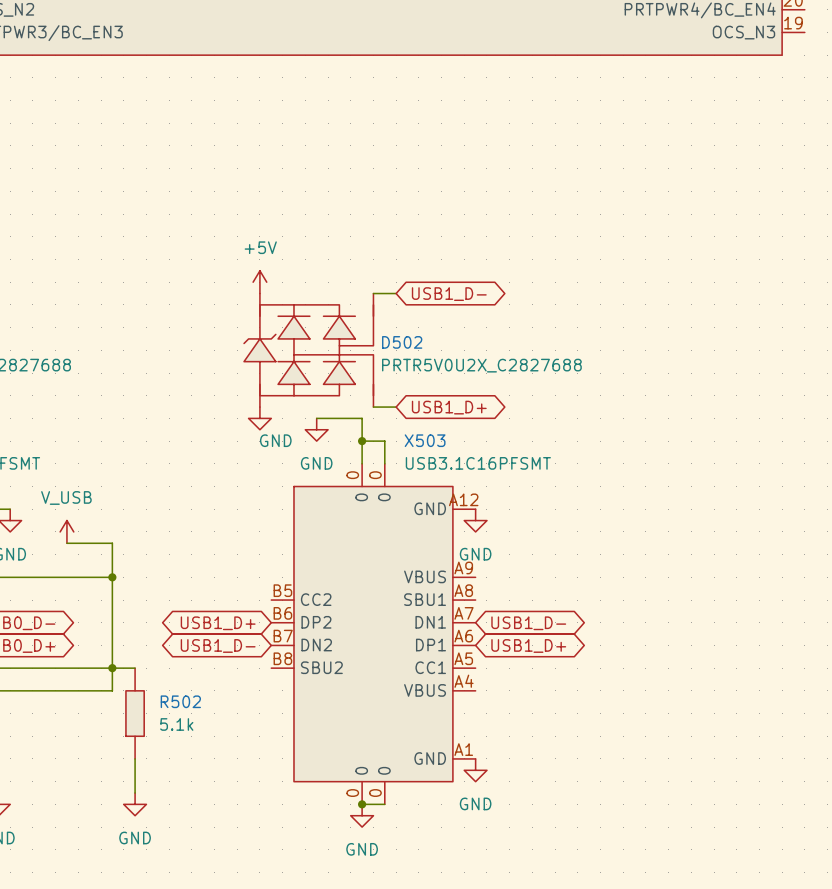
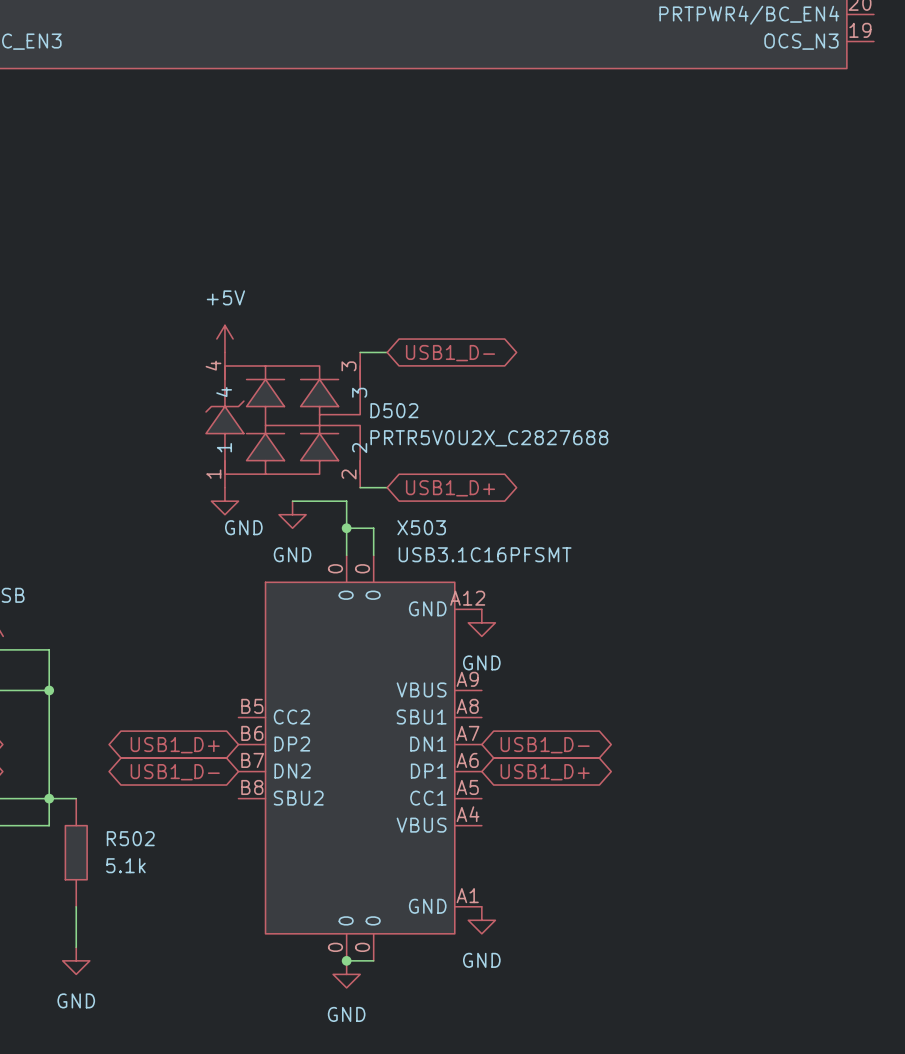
D502 pin number: none -> 4 (213, 365)
D502 pin number: none -> 3 (349, 366)
D502 pin name: none -> 4 (224, 392)
D502 pin name: none -> 3 (359, 392)
D502 pin name: none -> 1 (224, 447)
D502 pin name: none -> 2 (359, 448)
D502 pin number: none -> 1 (213, 474)
D502 pin number: none -> 2 (349, 474)

